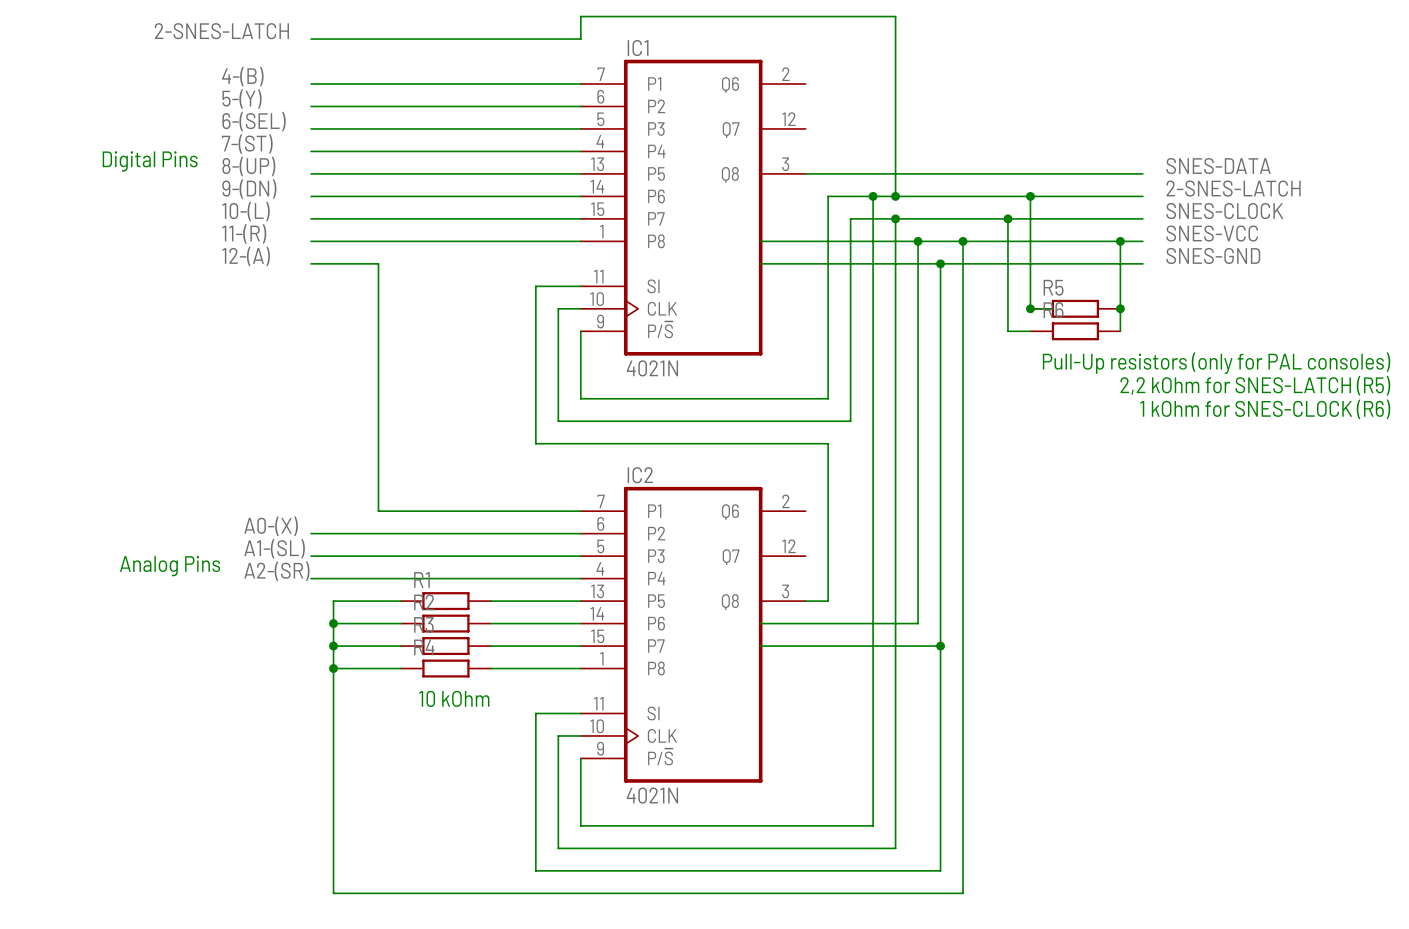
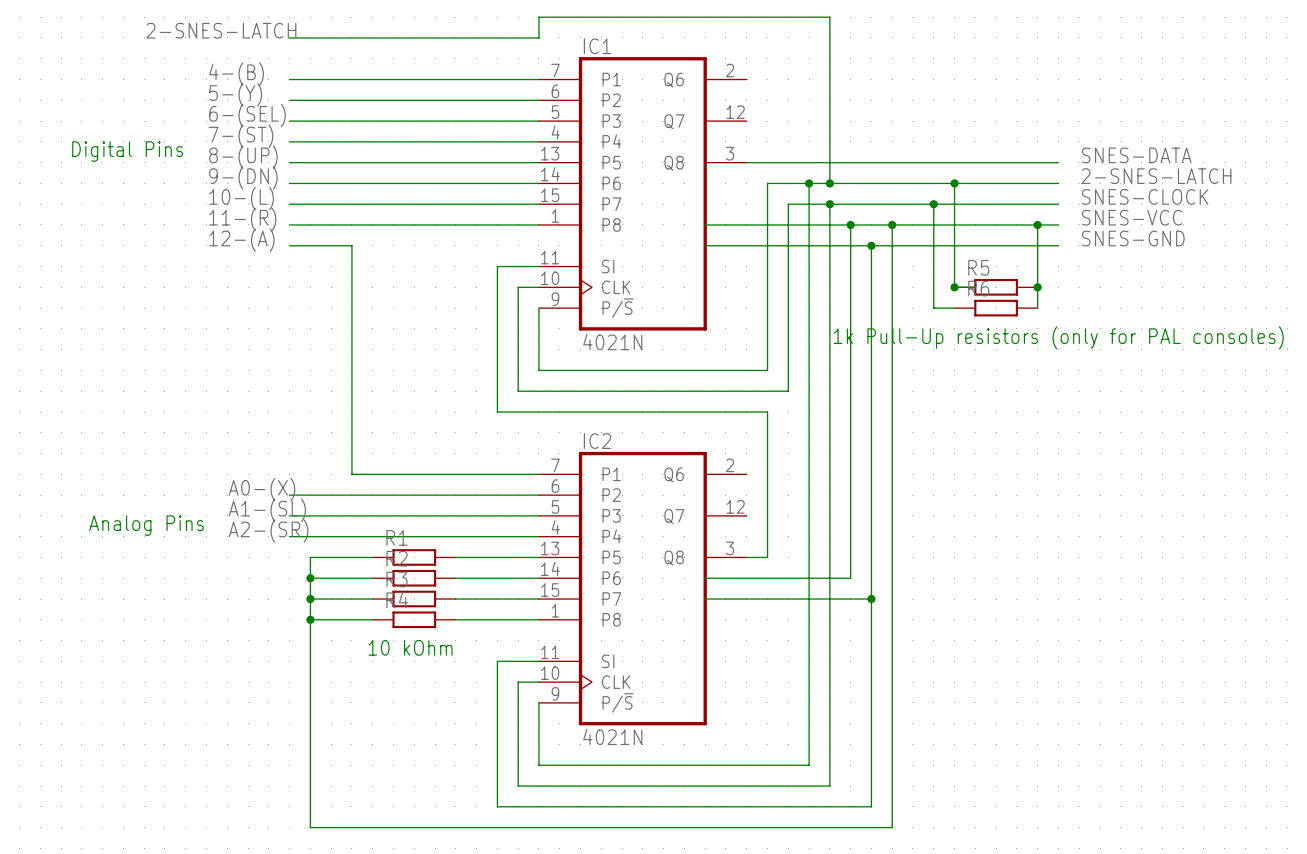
text: Pull-Up resistors (only for PAL consoles) (1216, 363) -> 1k Pull-Up resistors (only for PAL consoles) (1058, 337)
text: 2,2 kOhm for SNES-LATCH (R5) (1255, 385) -> none
text: 1 kOhm for SNES-CLOCK (R6) (1265, 409) -> none

